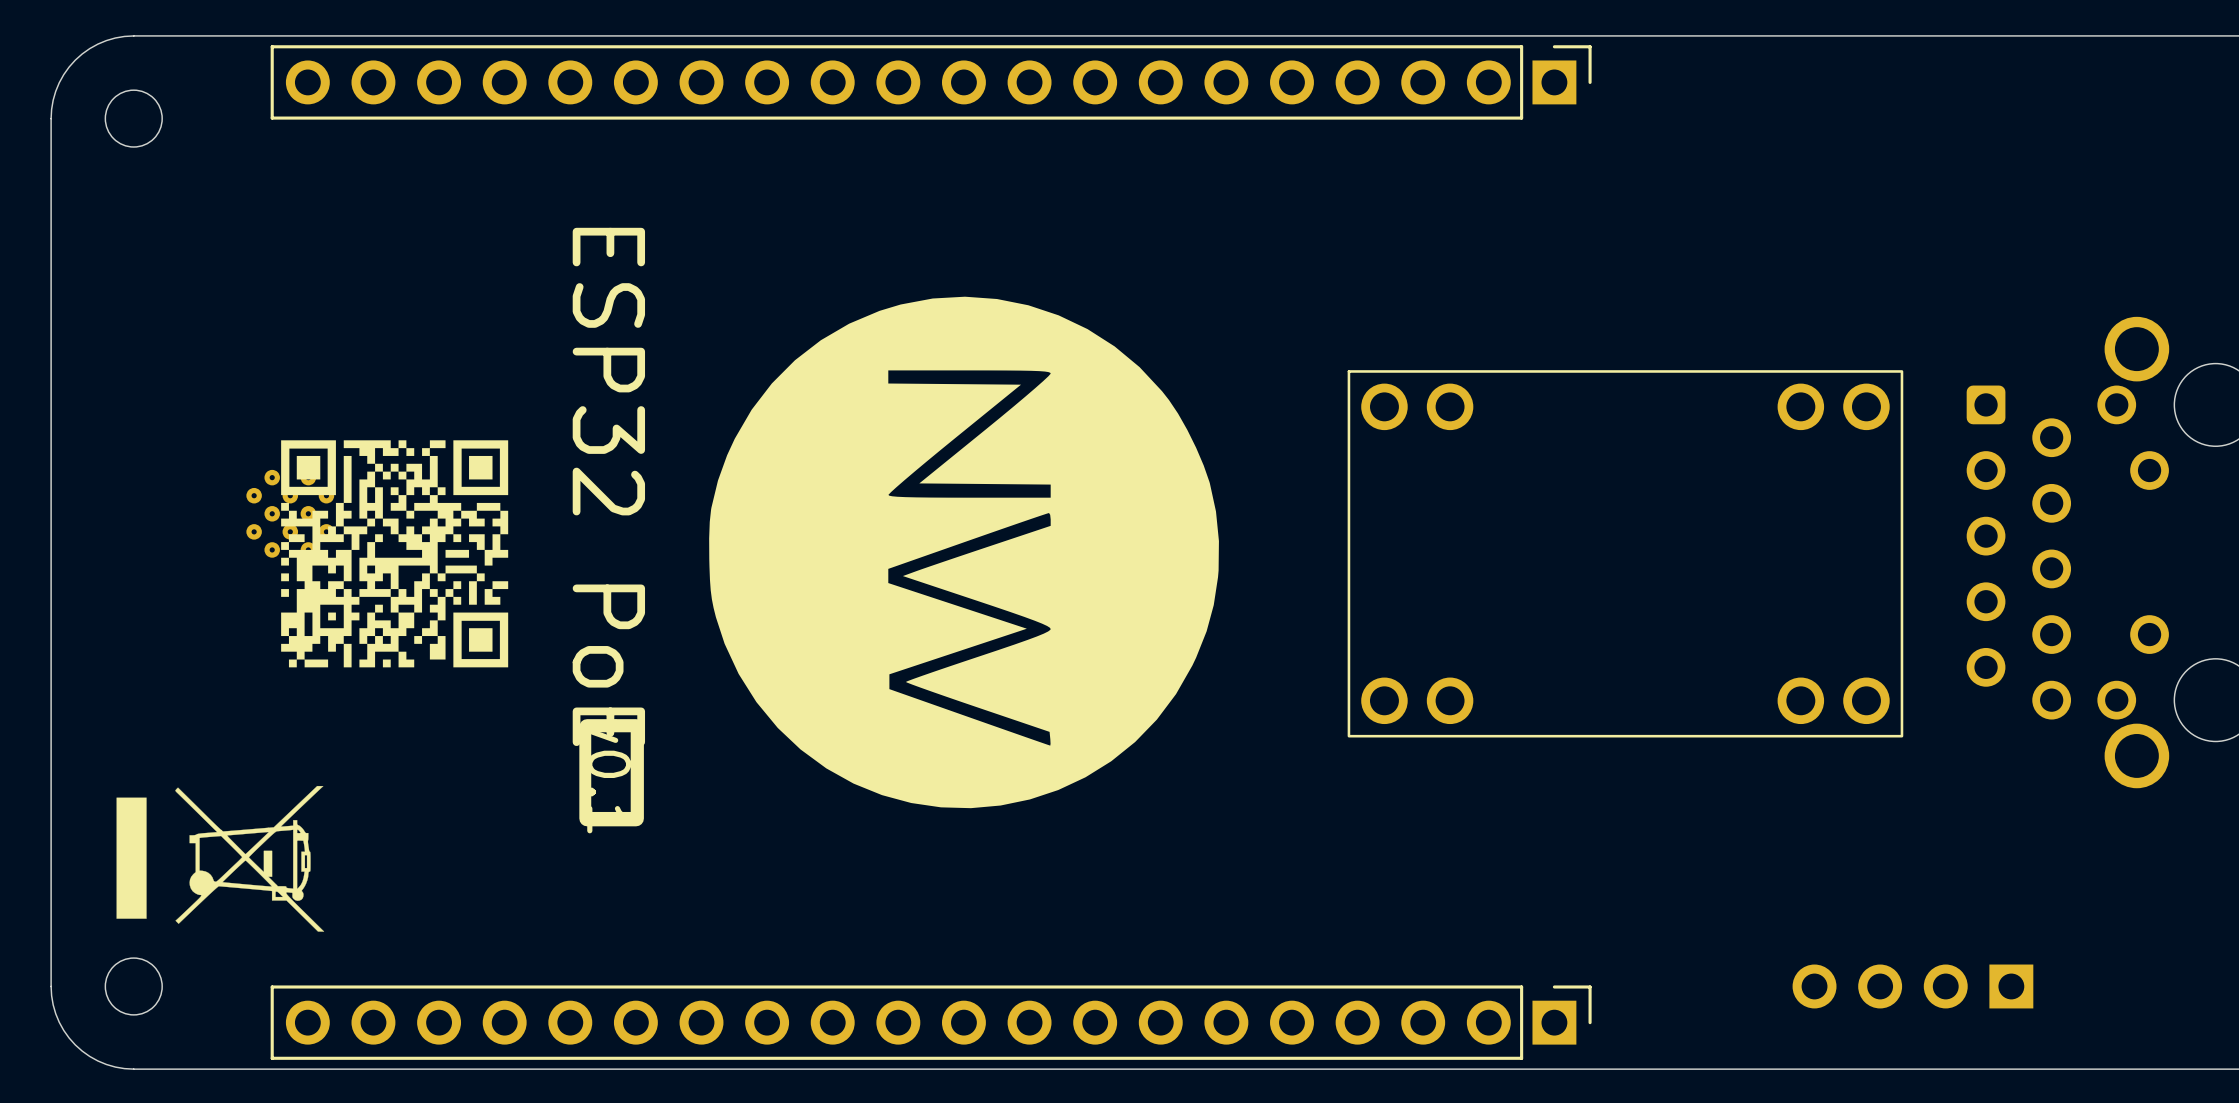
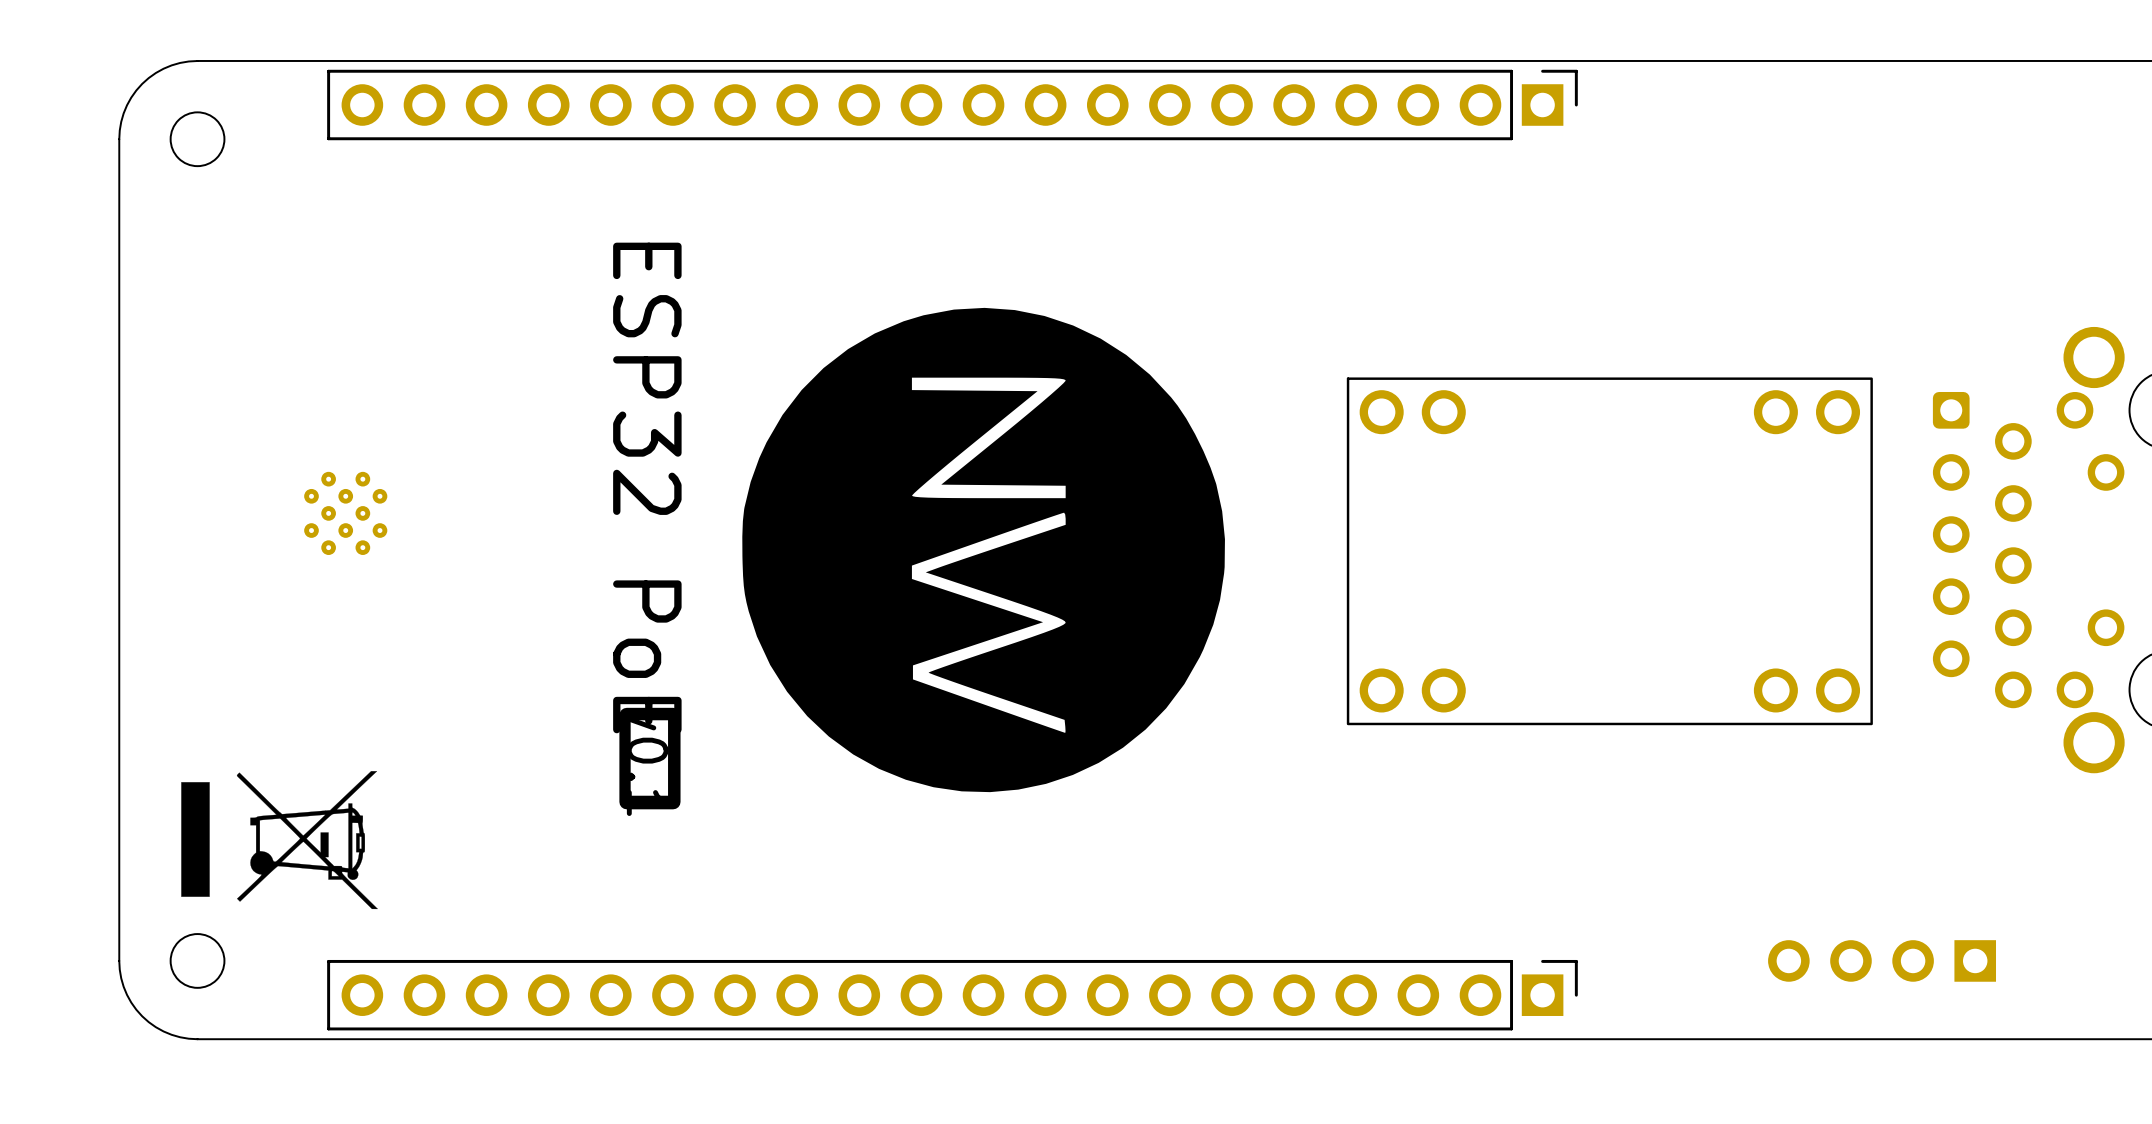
drawing: [281, 440, 509, 668] -> none

